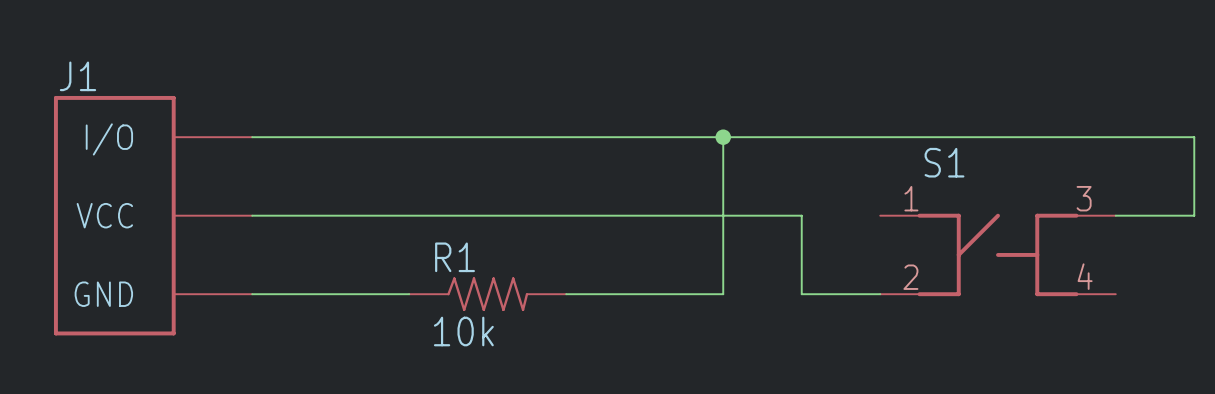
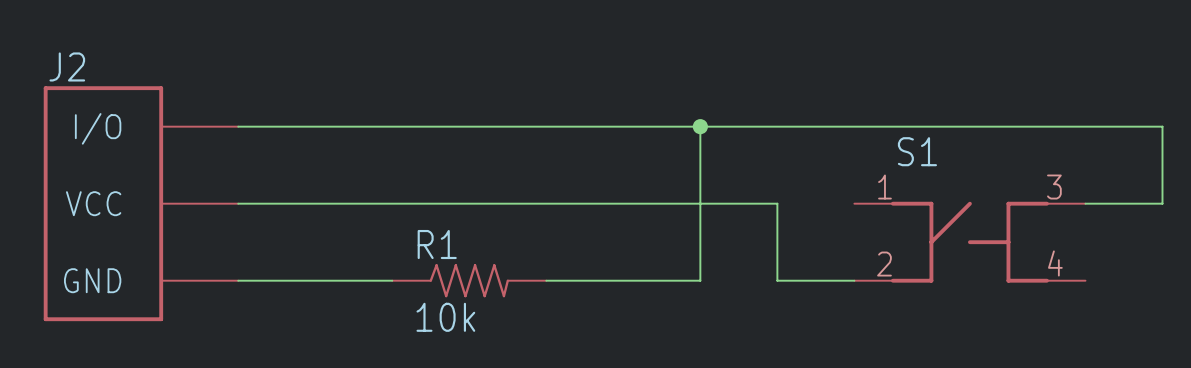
J1 name: J1 (77, 76) -> J2 (67, 66)

